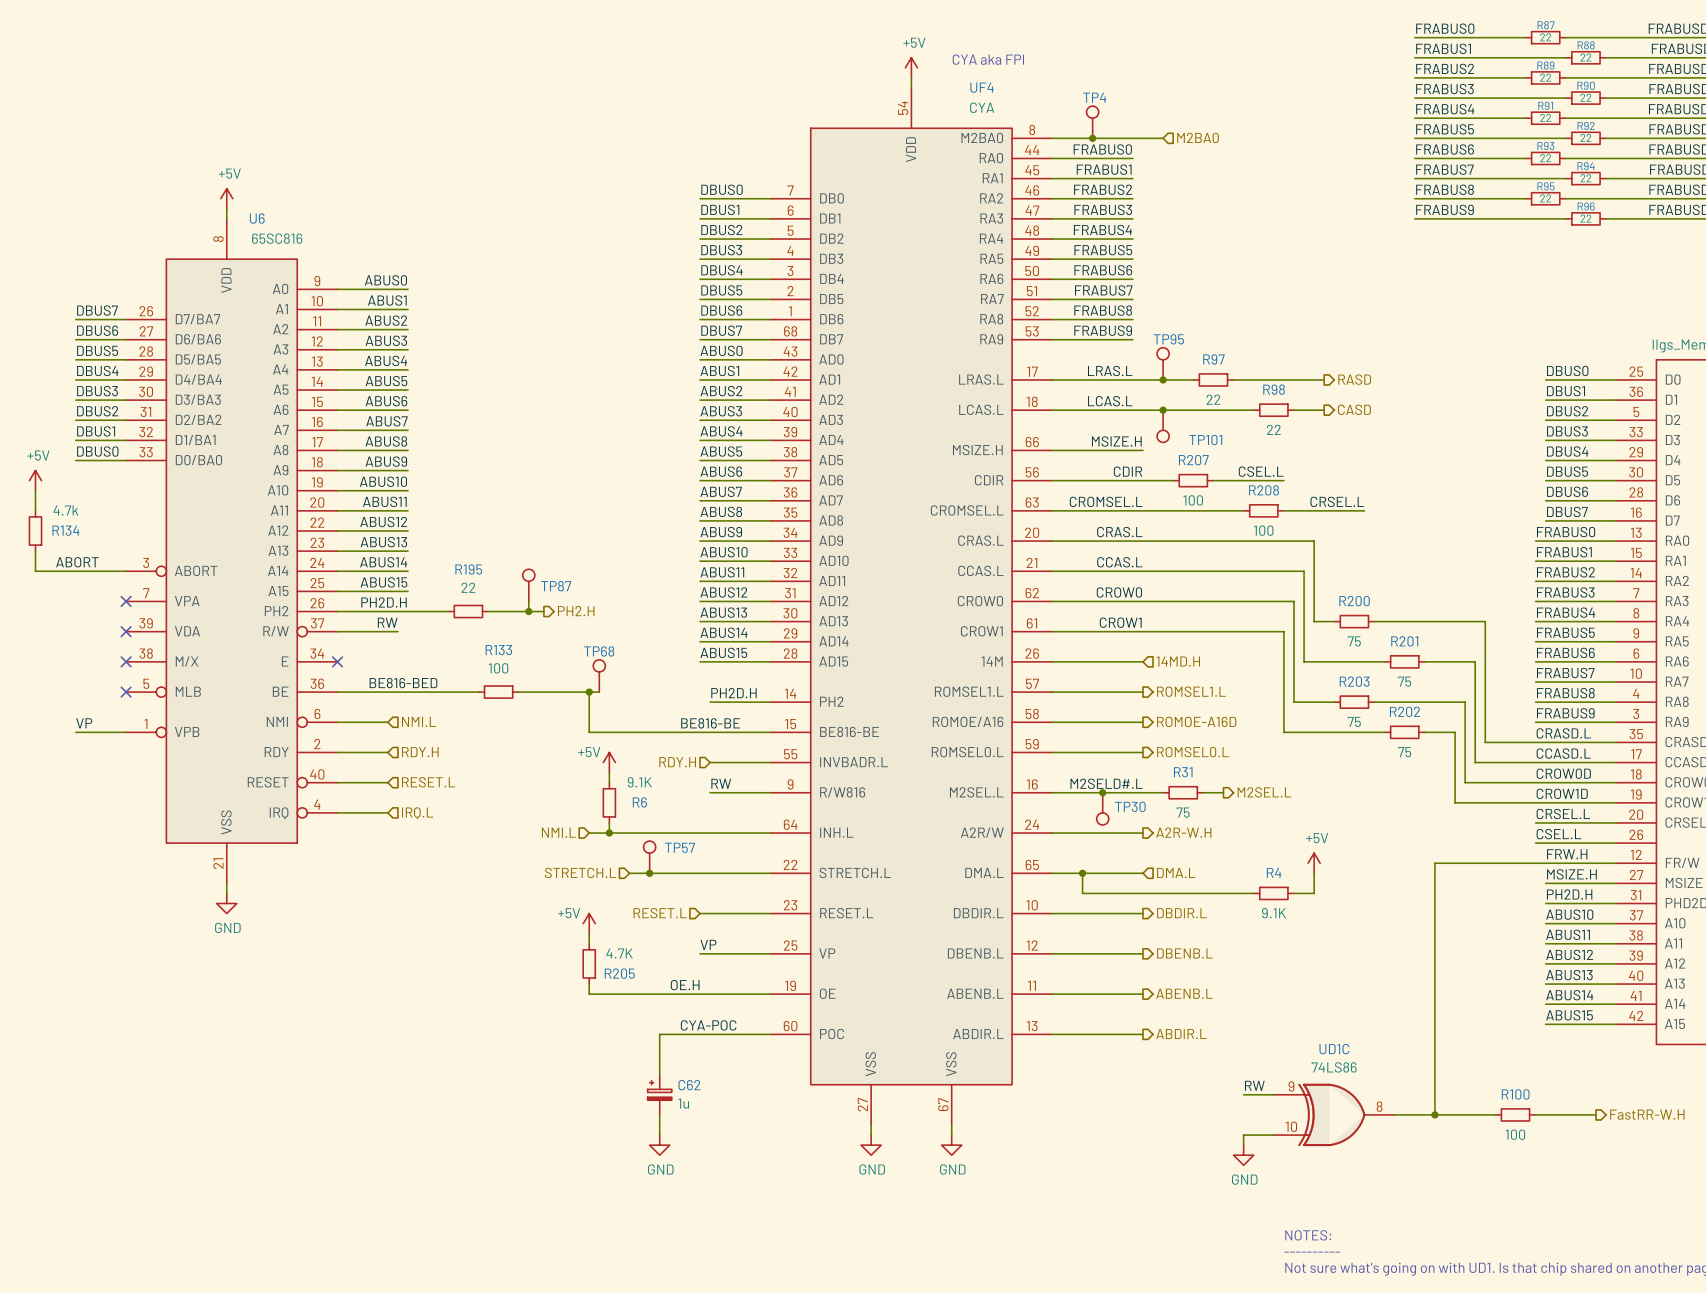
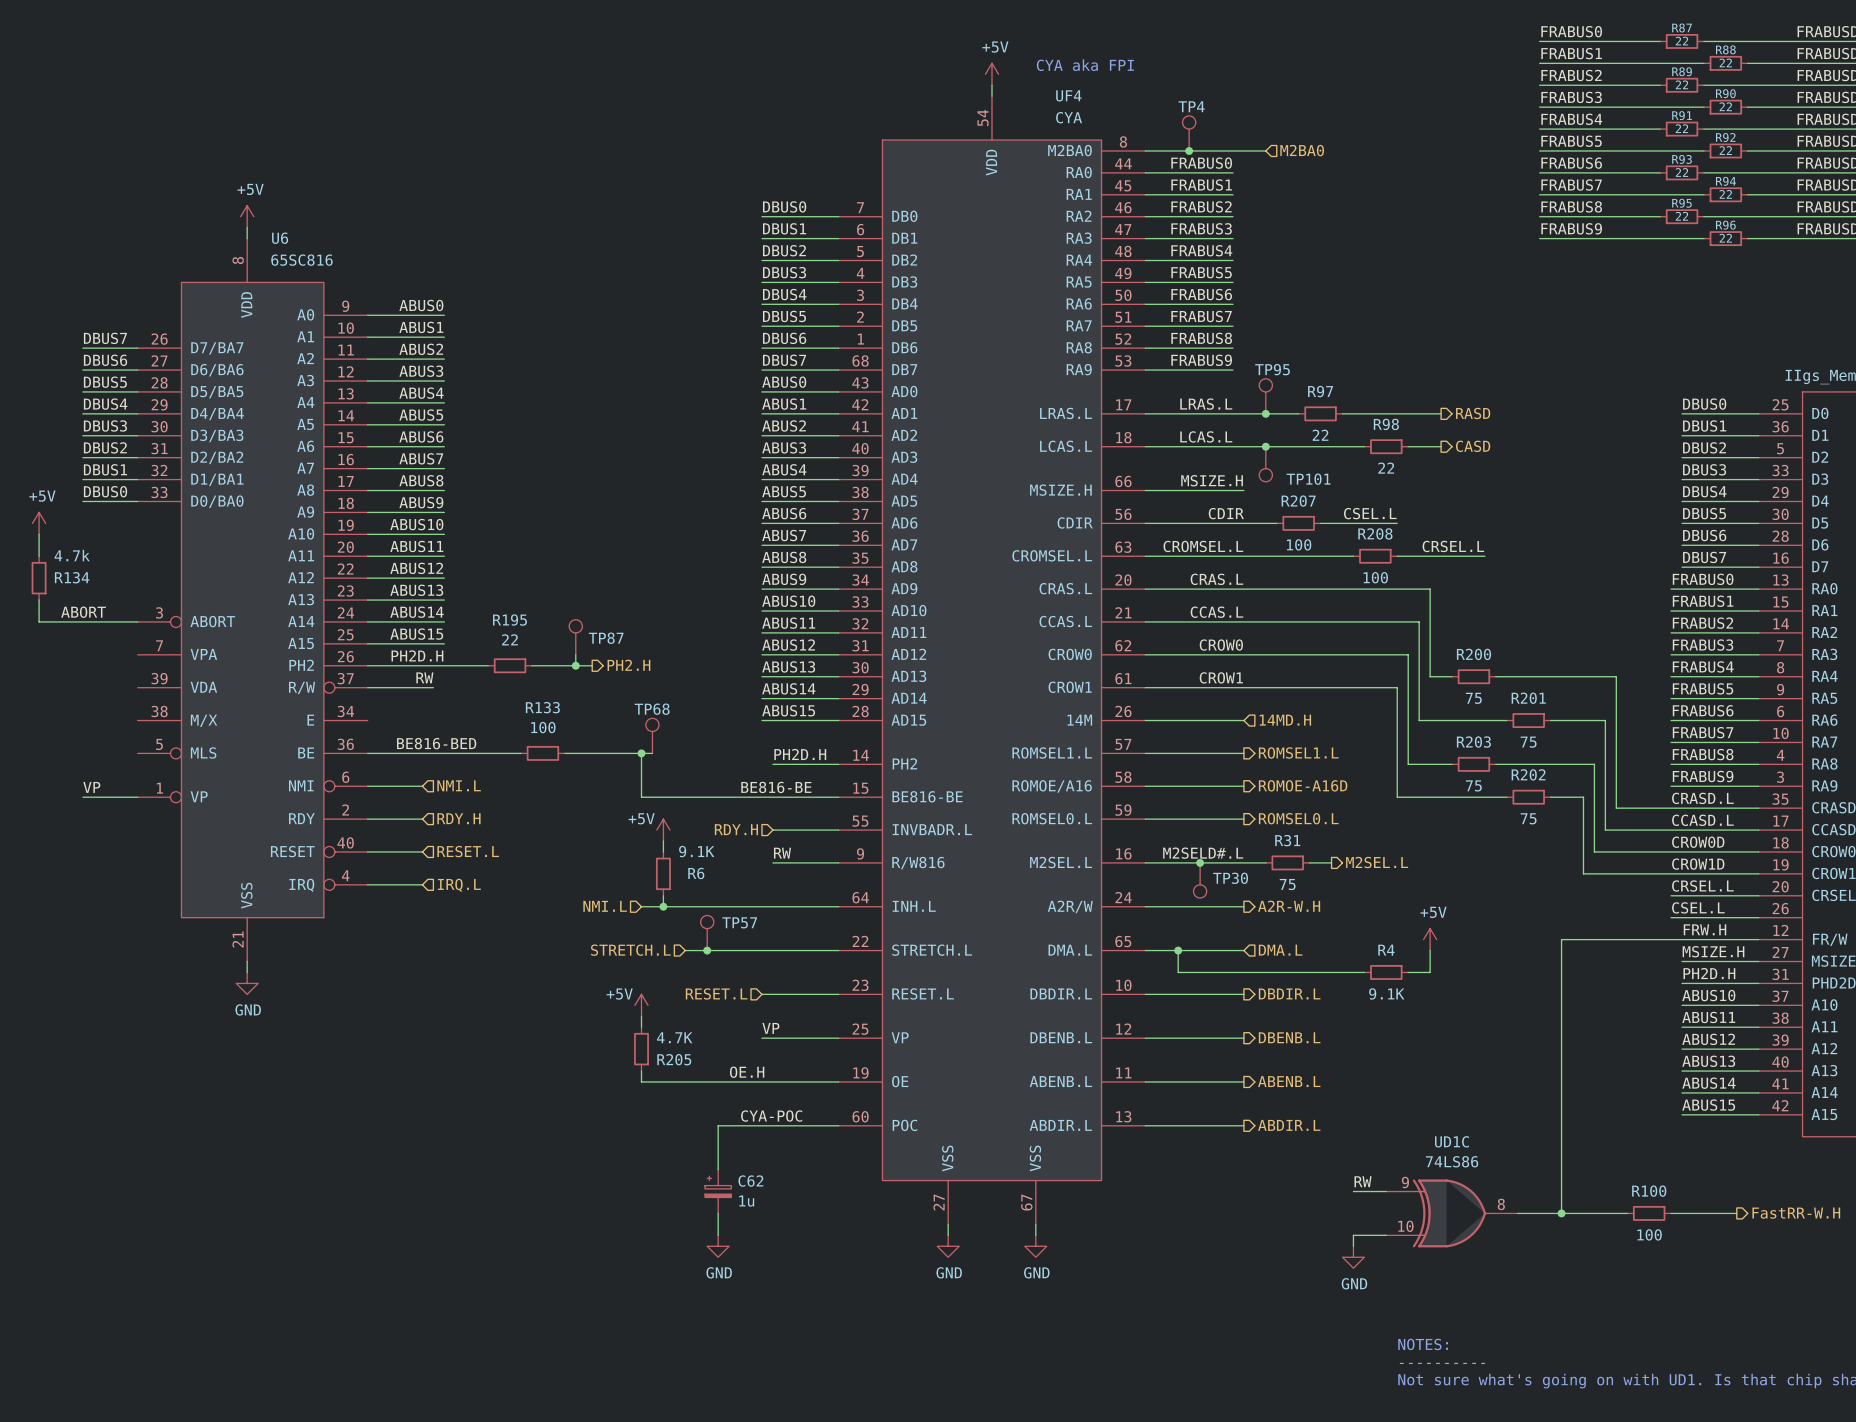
no-connect mark: (126, 601) -> none
no-connect mark: (126, 631) -> none
no-connect mark: (126, 661) -> none
no-connect mark: (337, 661) -> none
U6 pin name: MLB (188, 691) -> MLS (203, 753)
no-connect mark: (126, 692) -> none
U6 pin name: VPB (187, 731) -> VP (199, 796)

